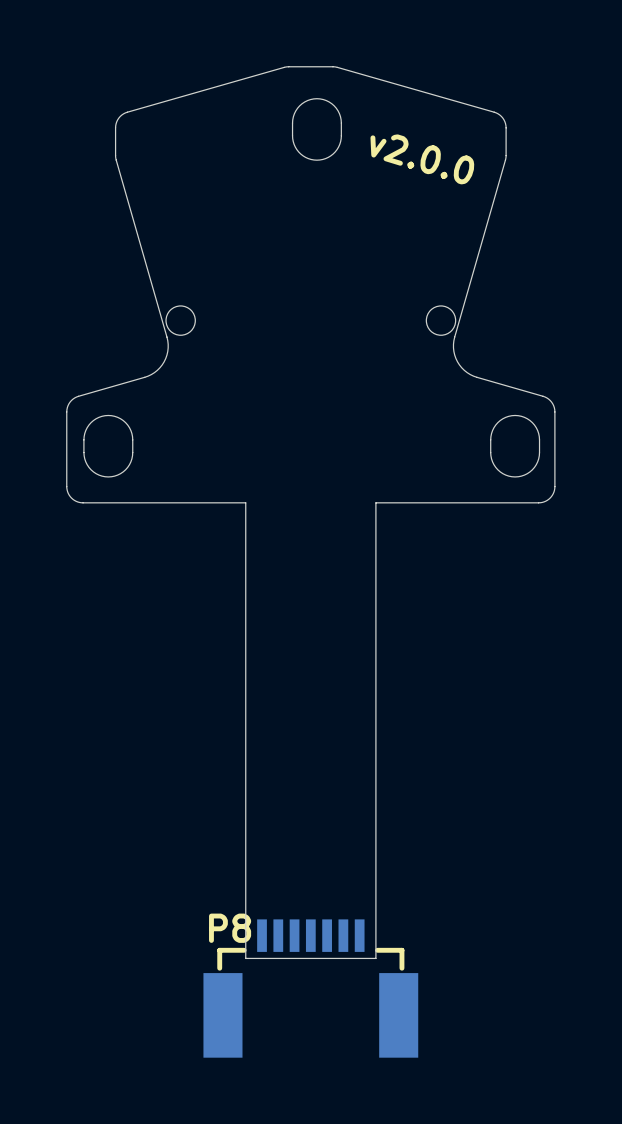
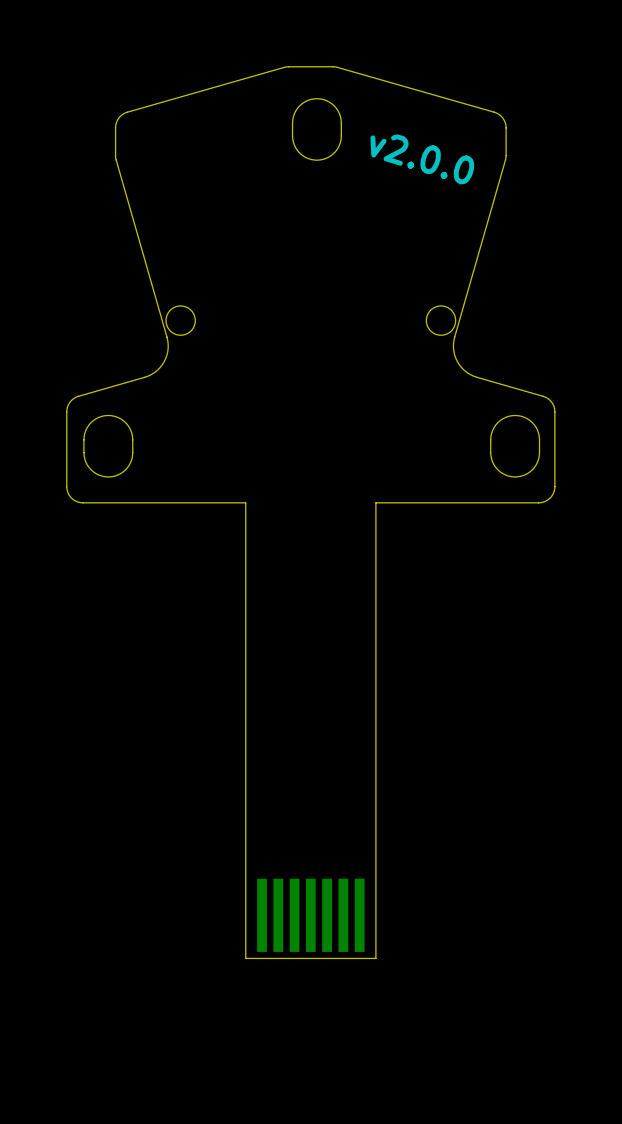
part: none -> (310, 915)
P8: (310, 988) -> none

